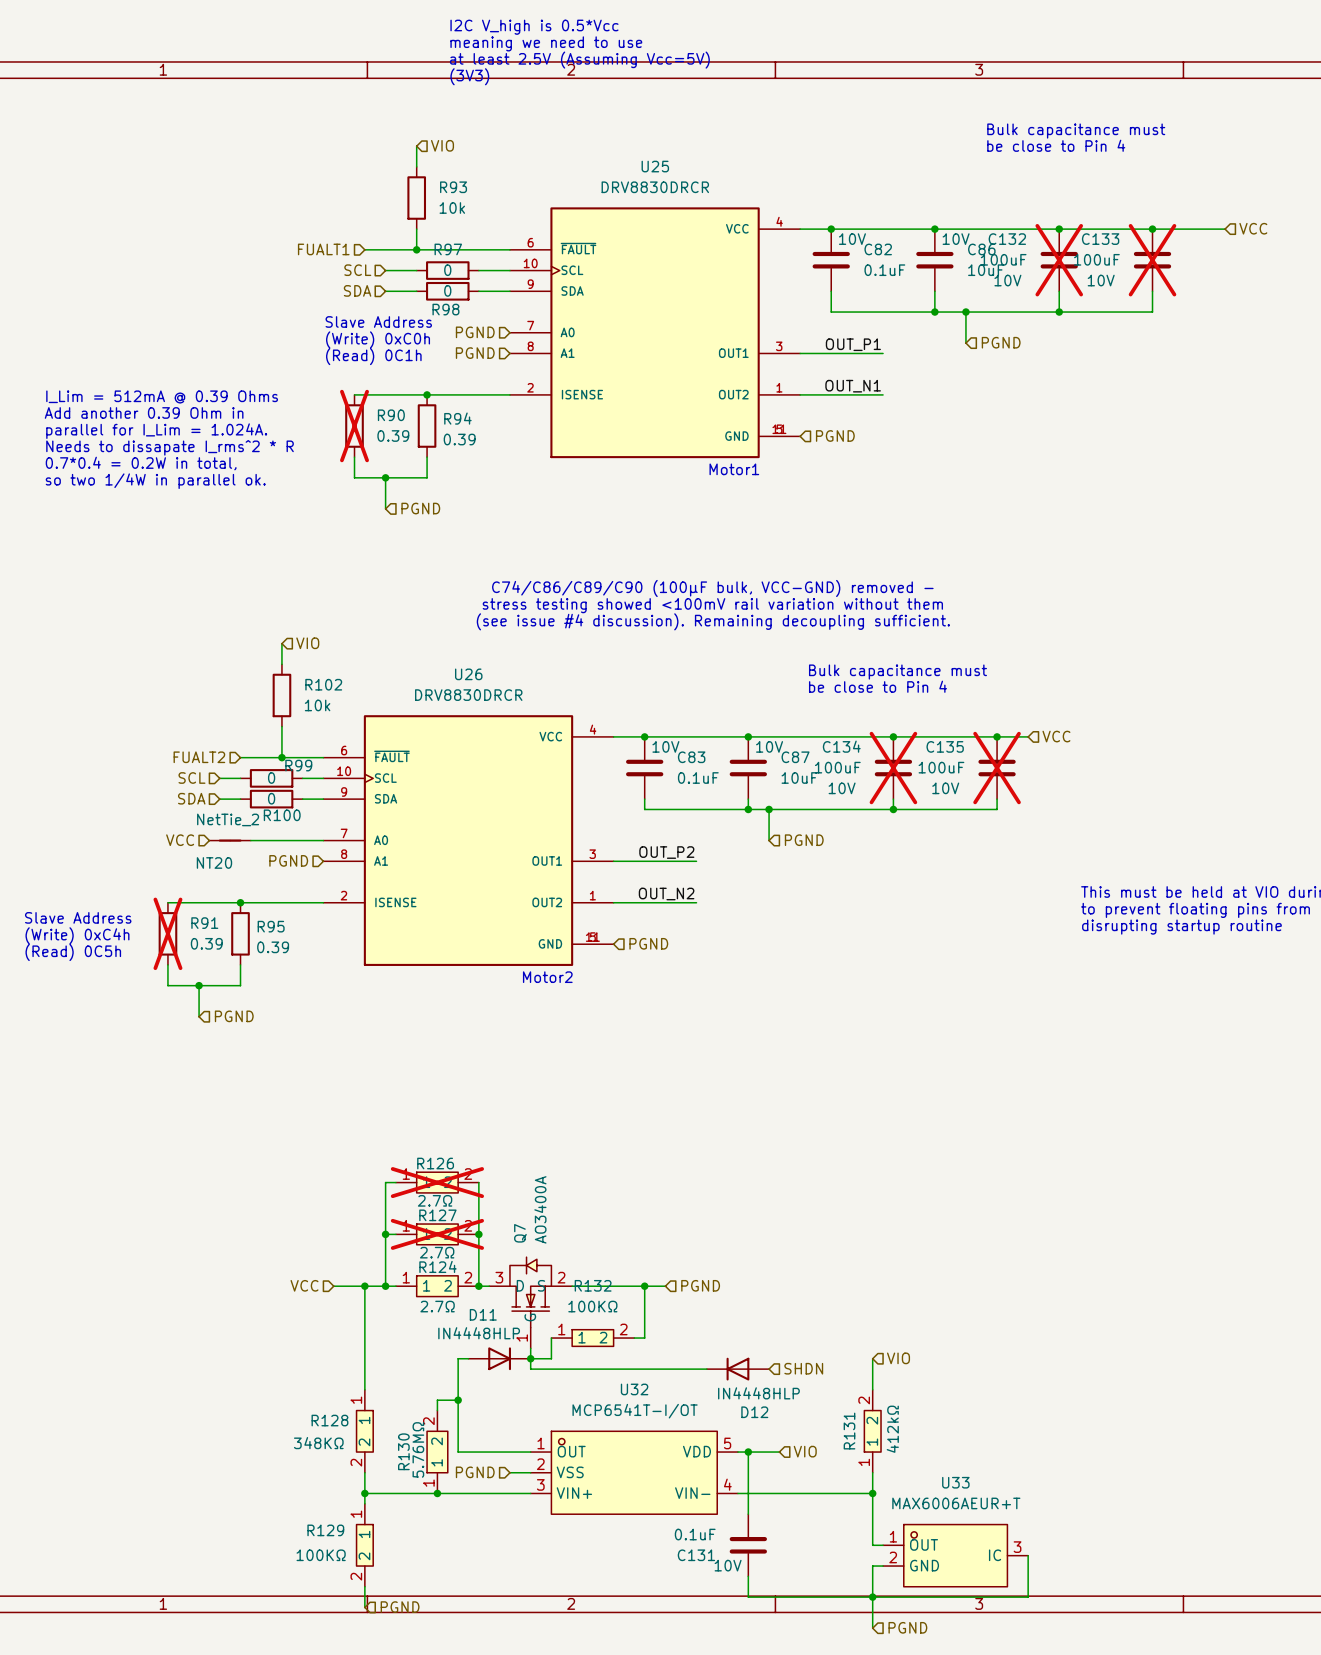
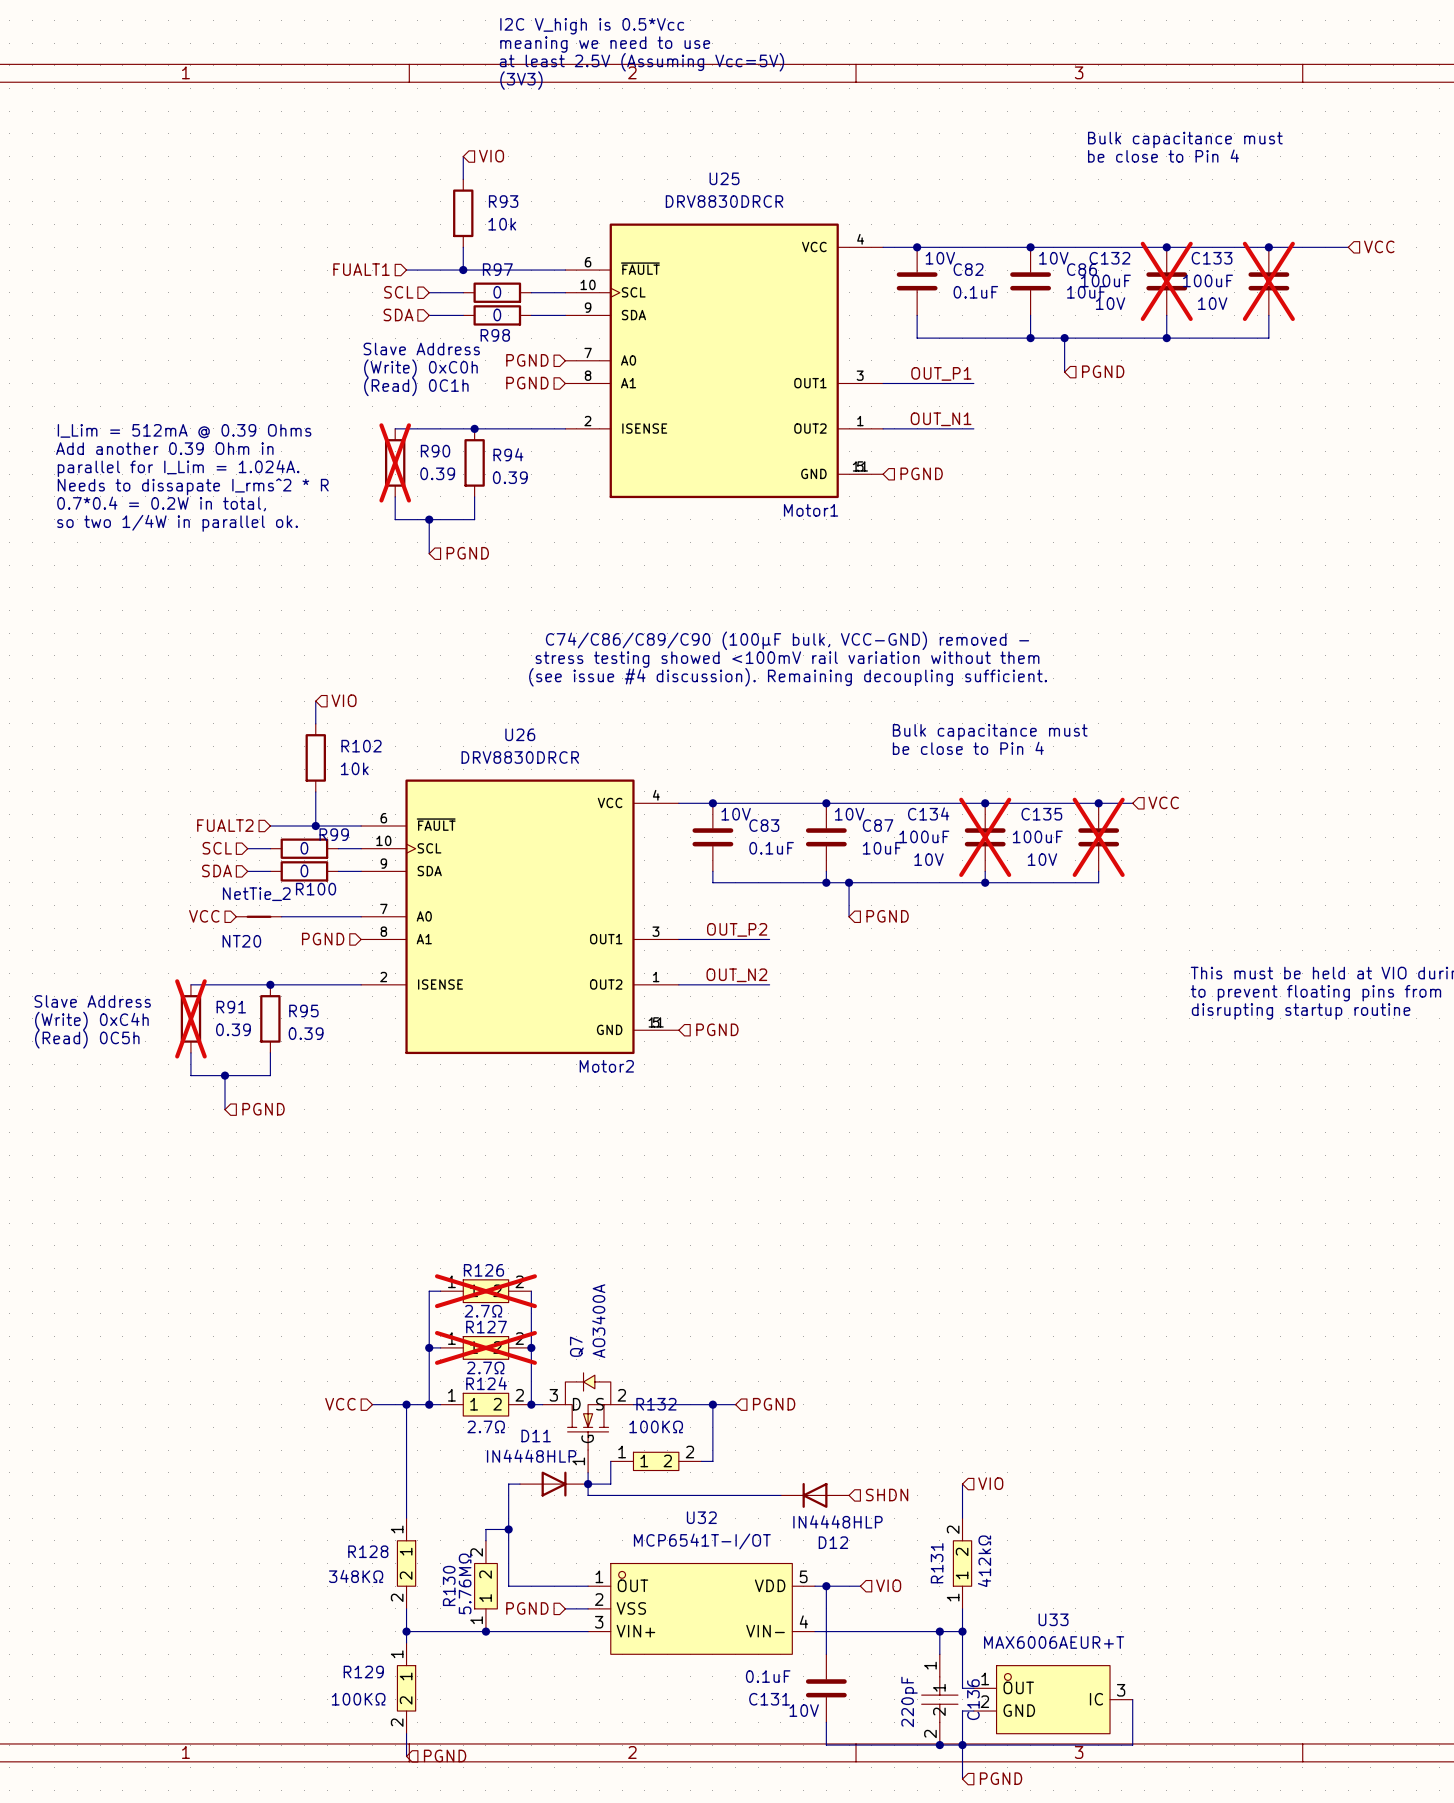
wire: none -> (939, 1631) (939, 1654)
junction: none -> (939, 1631)
C136: none -> 220pF (939, 1699)
junction: none -> (939, 1745)

